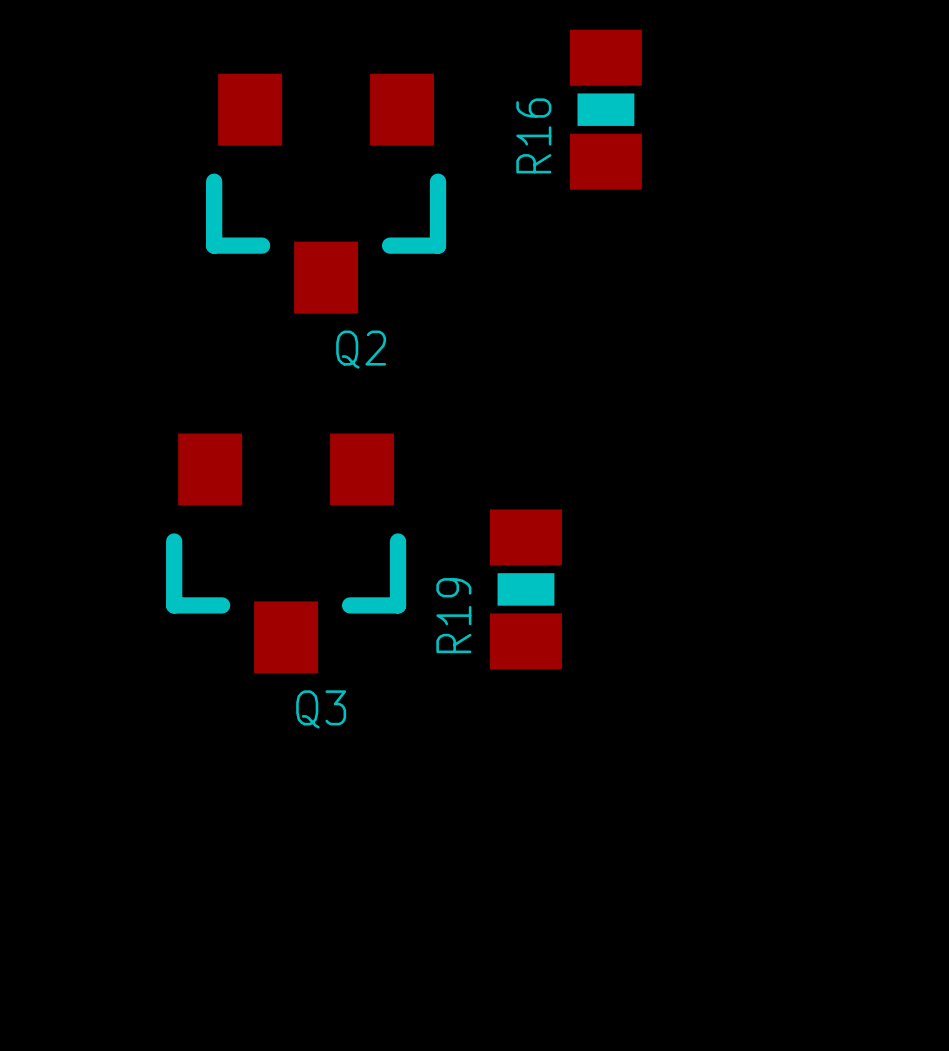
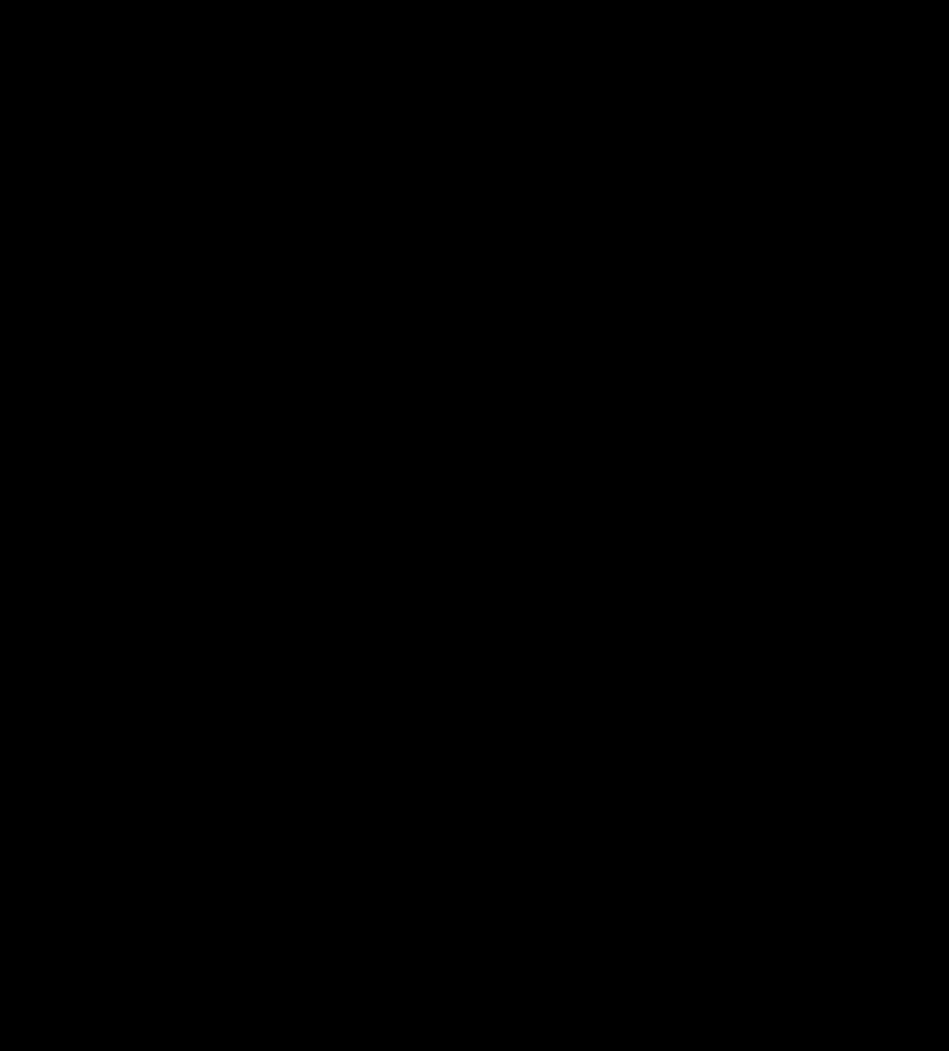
R16: (605, 109) -> none
Q2: (326, 193) -> none
Q3: (286, 553) -> none
R19: (525, 589) -> none

